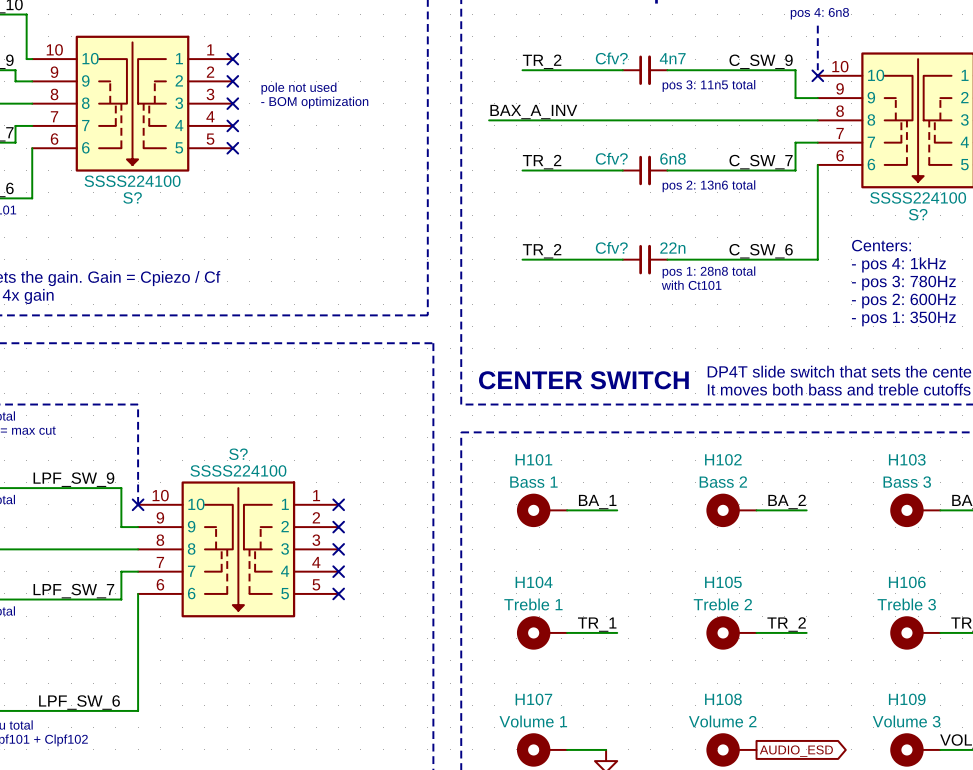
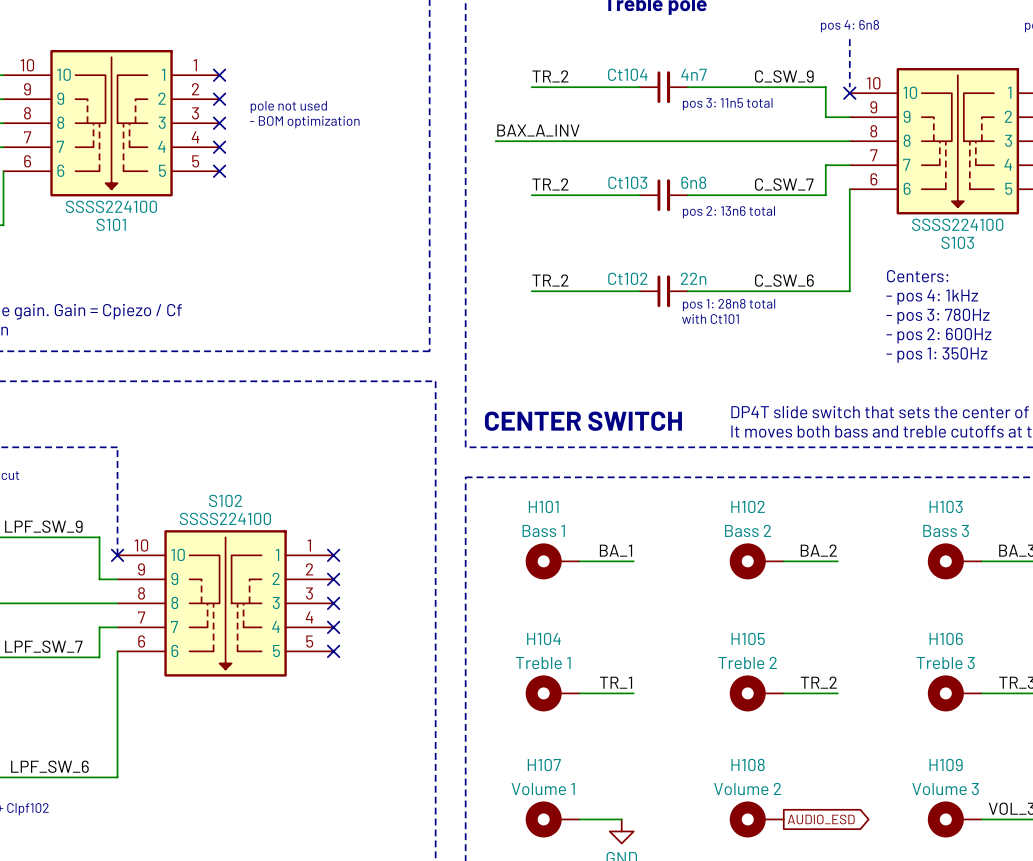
Cfv? name: Cfv? (611, 58) -> Ct104 (627, 74)
Cfv? name: Cfv? (611, 158) -> Ct103 (627, 182)
S? name: S? (132, 197) -> S101 (111, 224)
S? name: S? (918, 214) -> S103 (957, 242)
Cfv? name: Cfv? (611, 247) -> Ct102 (627, 278)
S? name: S? (238, 454) -> S102 (225, 500)

